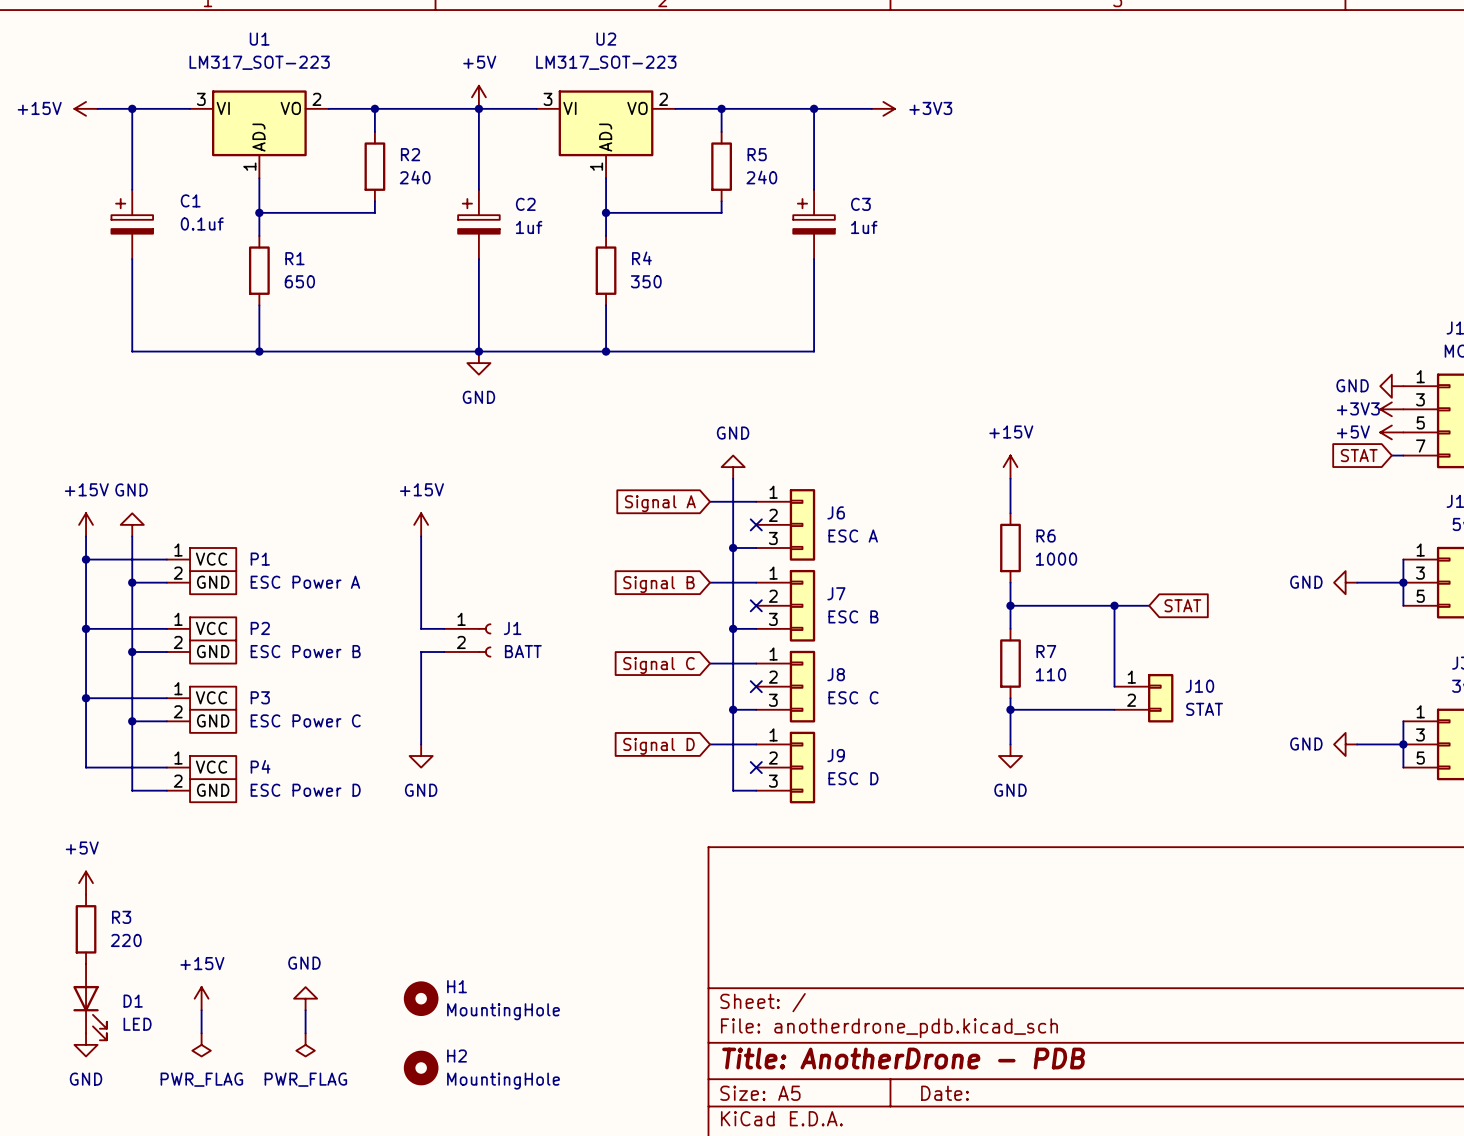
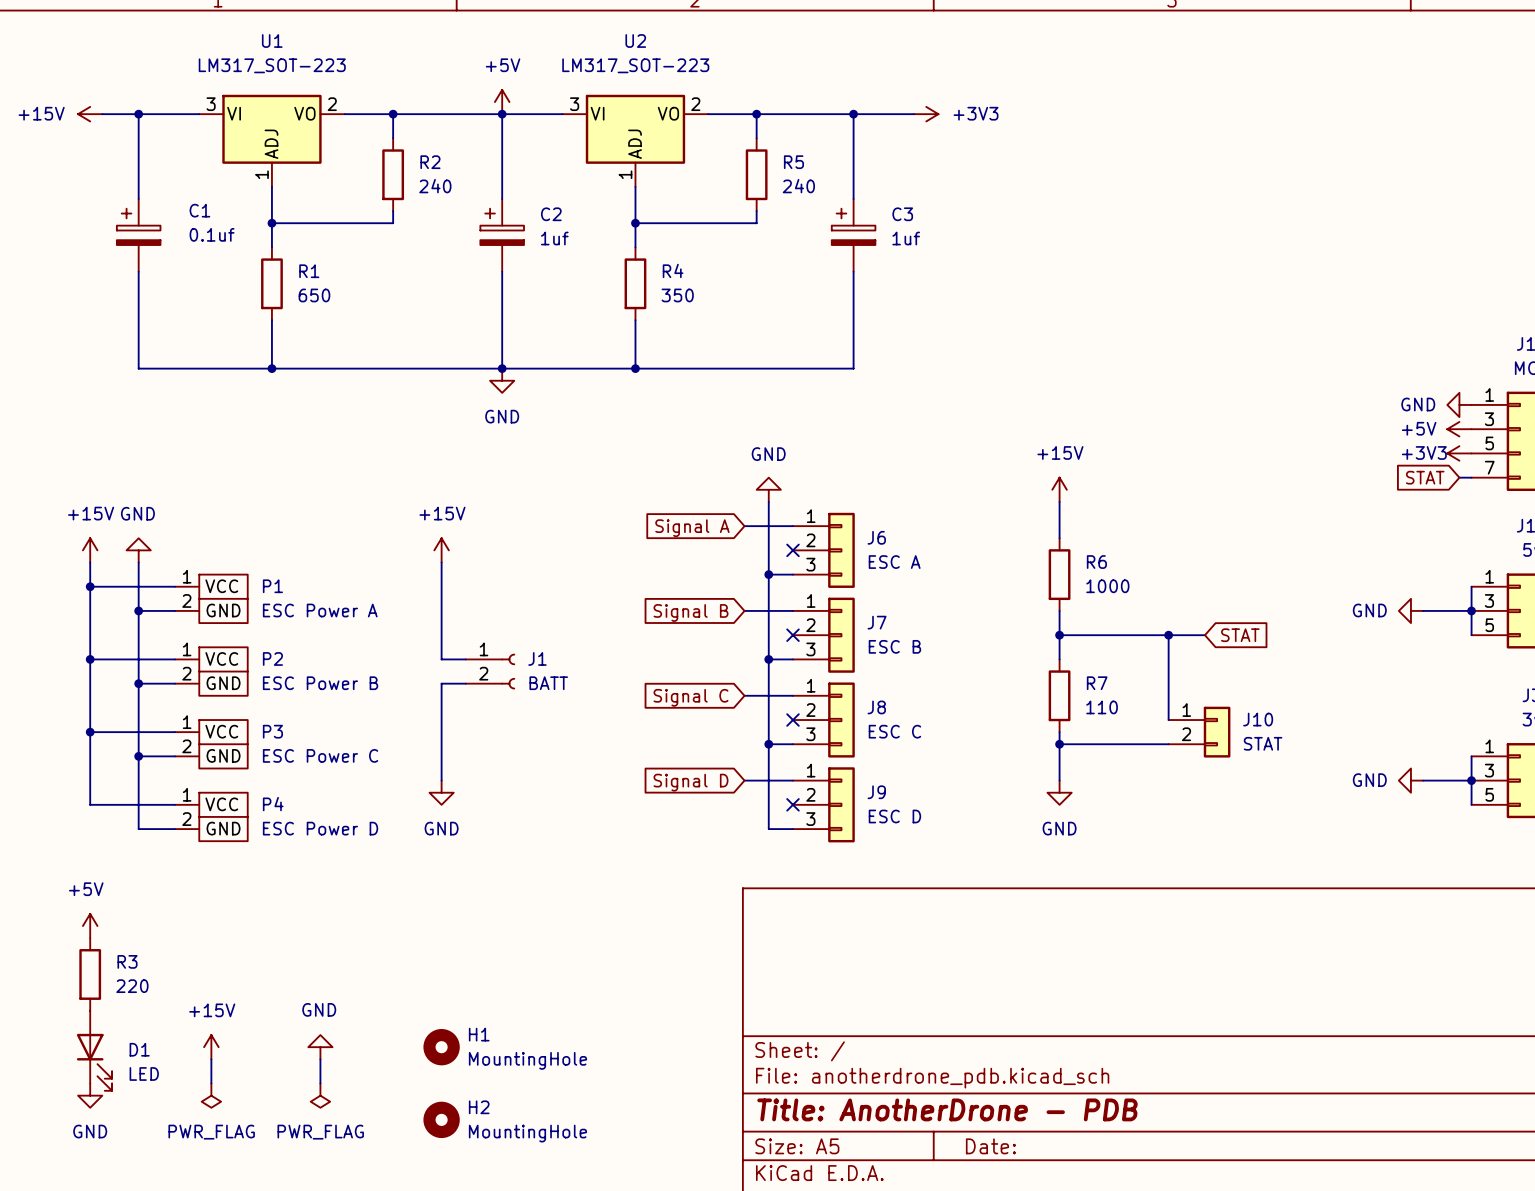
power symbol: +3V3 (1391, 409) -> +5V (1459, 429)
power symbol: +5V (1391, 432) -> +3V3 (1459, 453)

